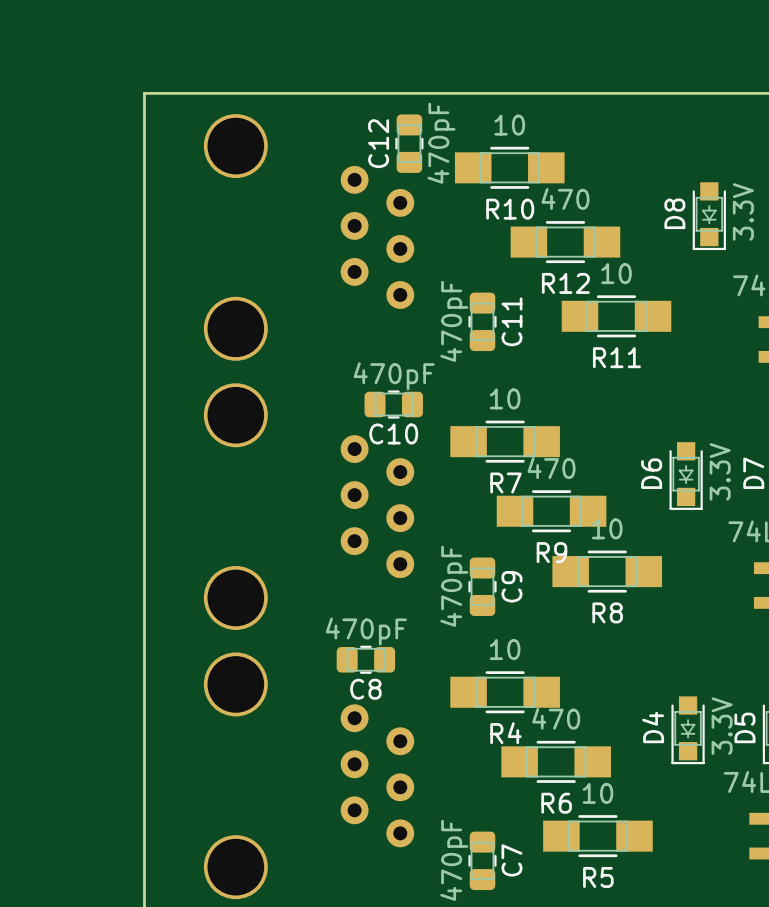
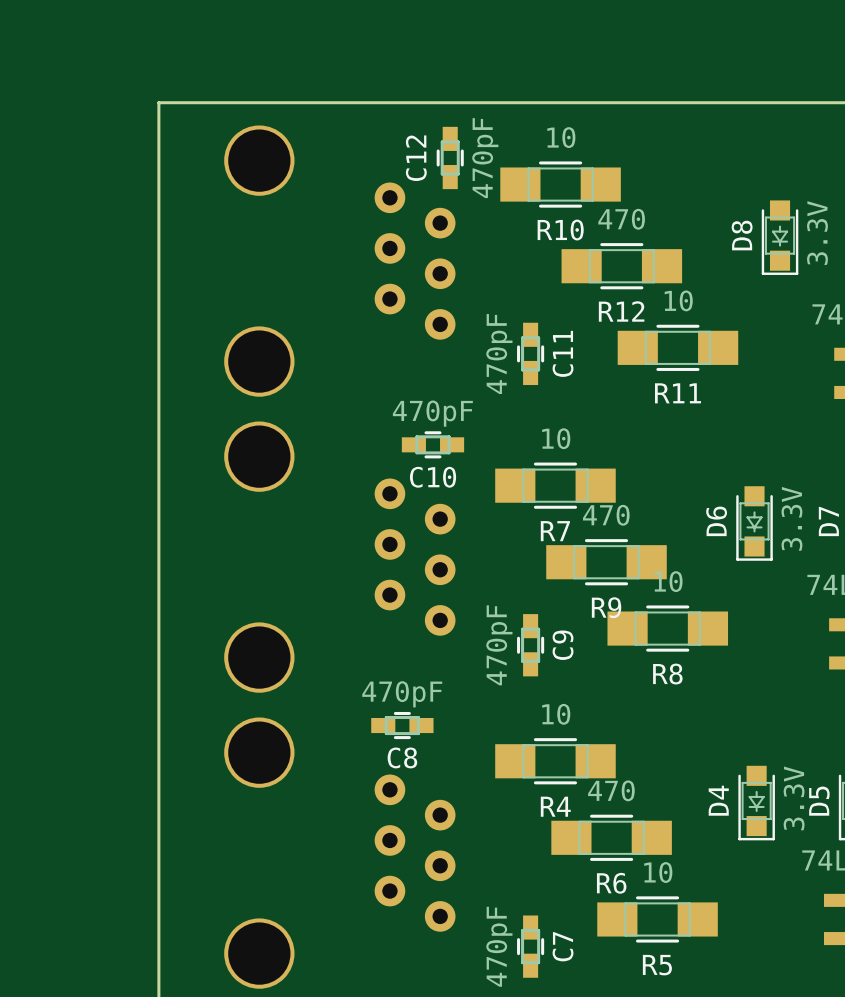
C12 footprint: [395, 114, 424, 173] -> [436, 126, 464, 190]
C11 footprint: [468, 292, 497, 352] -> [517, 322, 545, 386]
C10 footprint: [364, 390, 423, 419] -> [401, 431, 465, 459]
C9 footprint: [468, 557, 497, 616] -> [517, 614, 545, 677]
C8 footprint: [336, 645, 396, 674] -> [371, 711, 434, 740]
C7 footprint: [468, 831, 497, 891] -> [517, 915, 545, 978]

